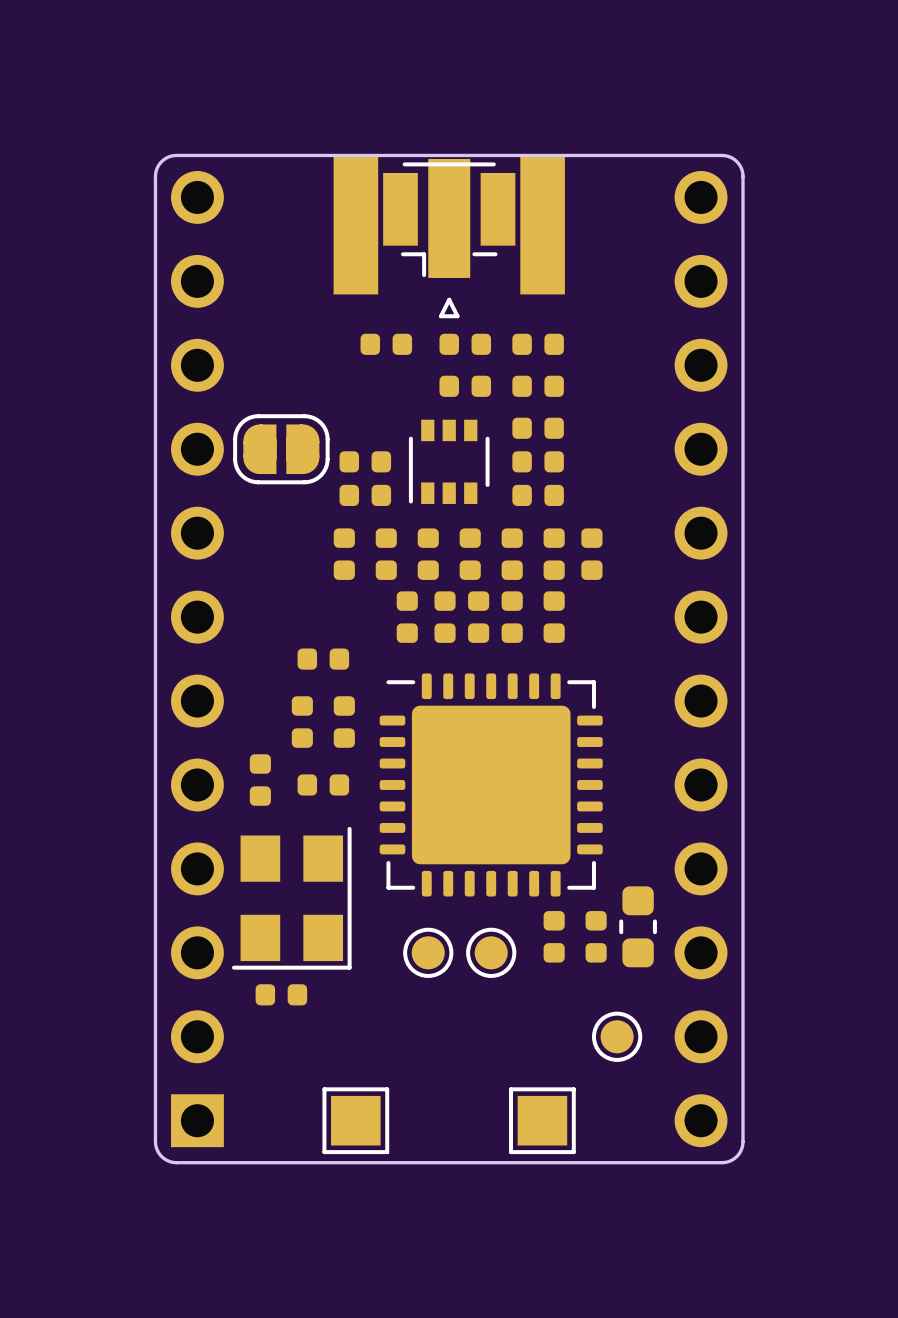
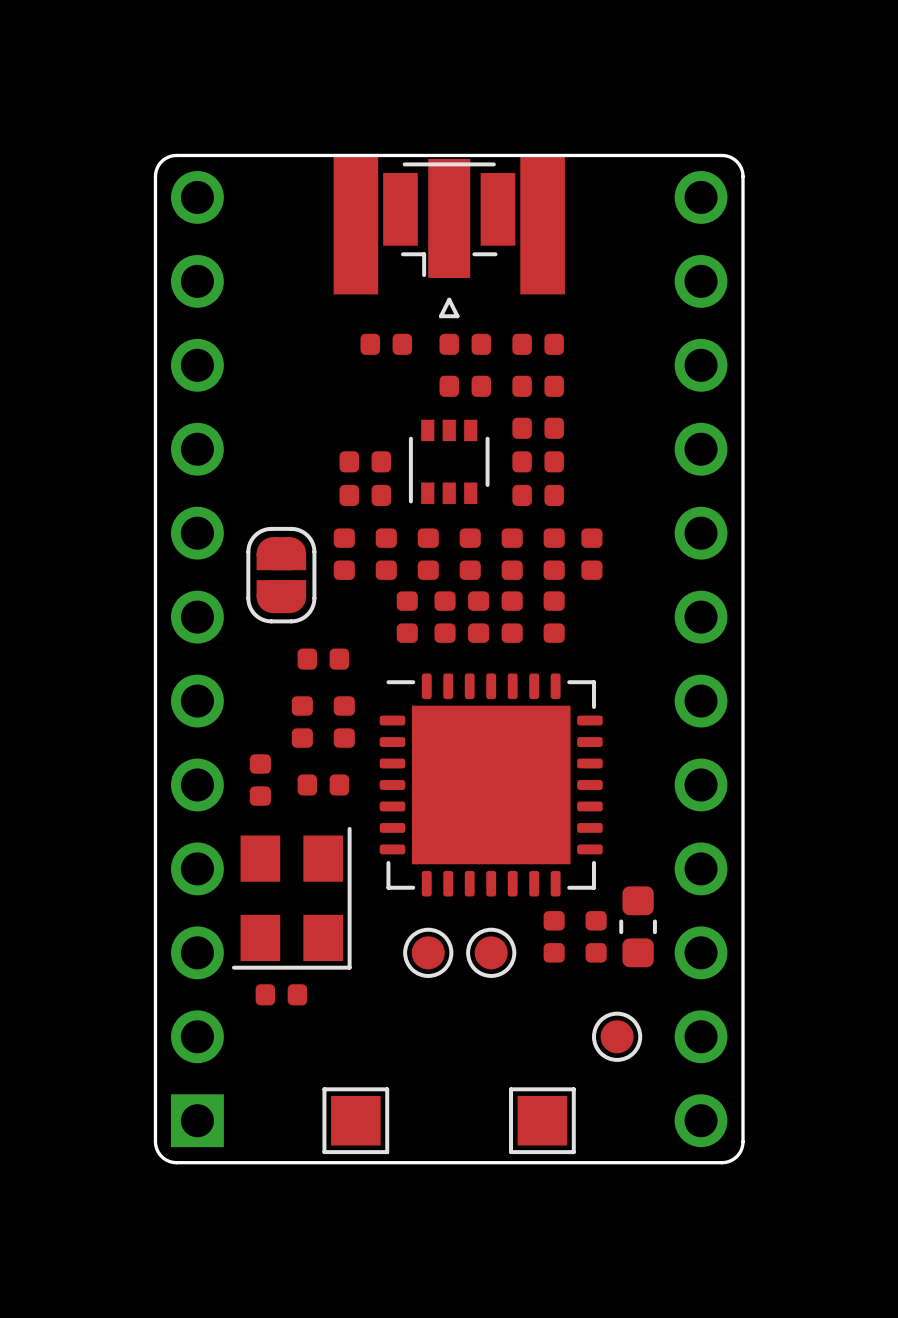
part rotation: 0° (281, 449) -> 90° clockwise (281, 575)
part position: (281, 449) -> (281, 575)
part footprint: [379, 673, 603, 897] -> [379, 673, 603, 897]

